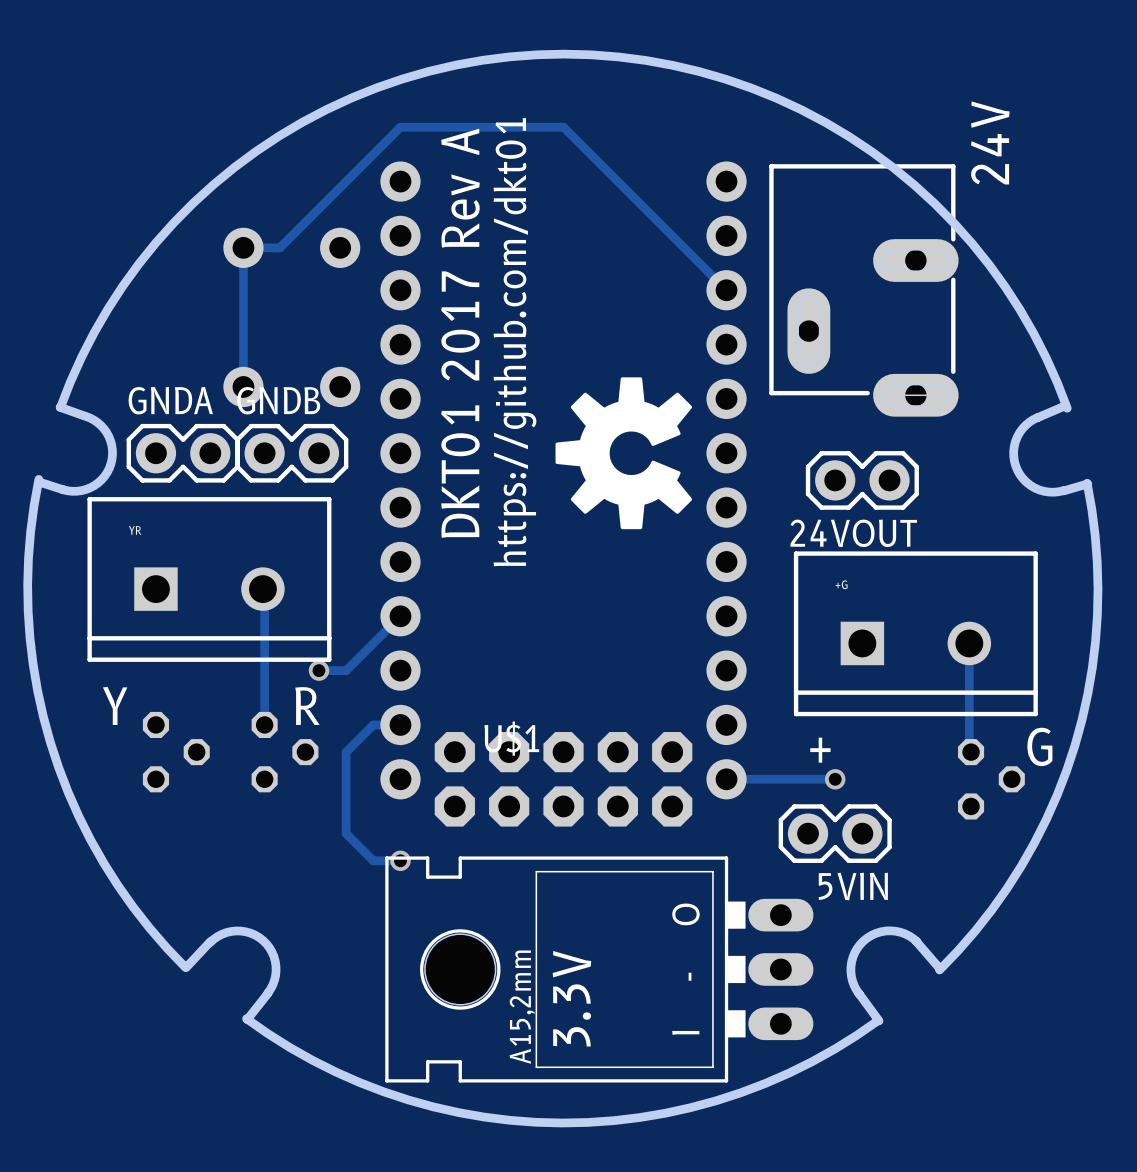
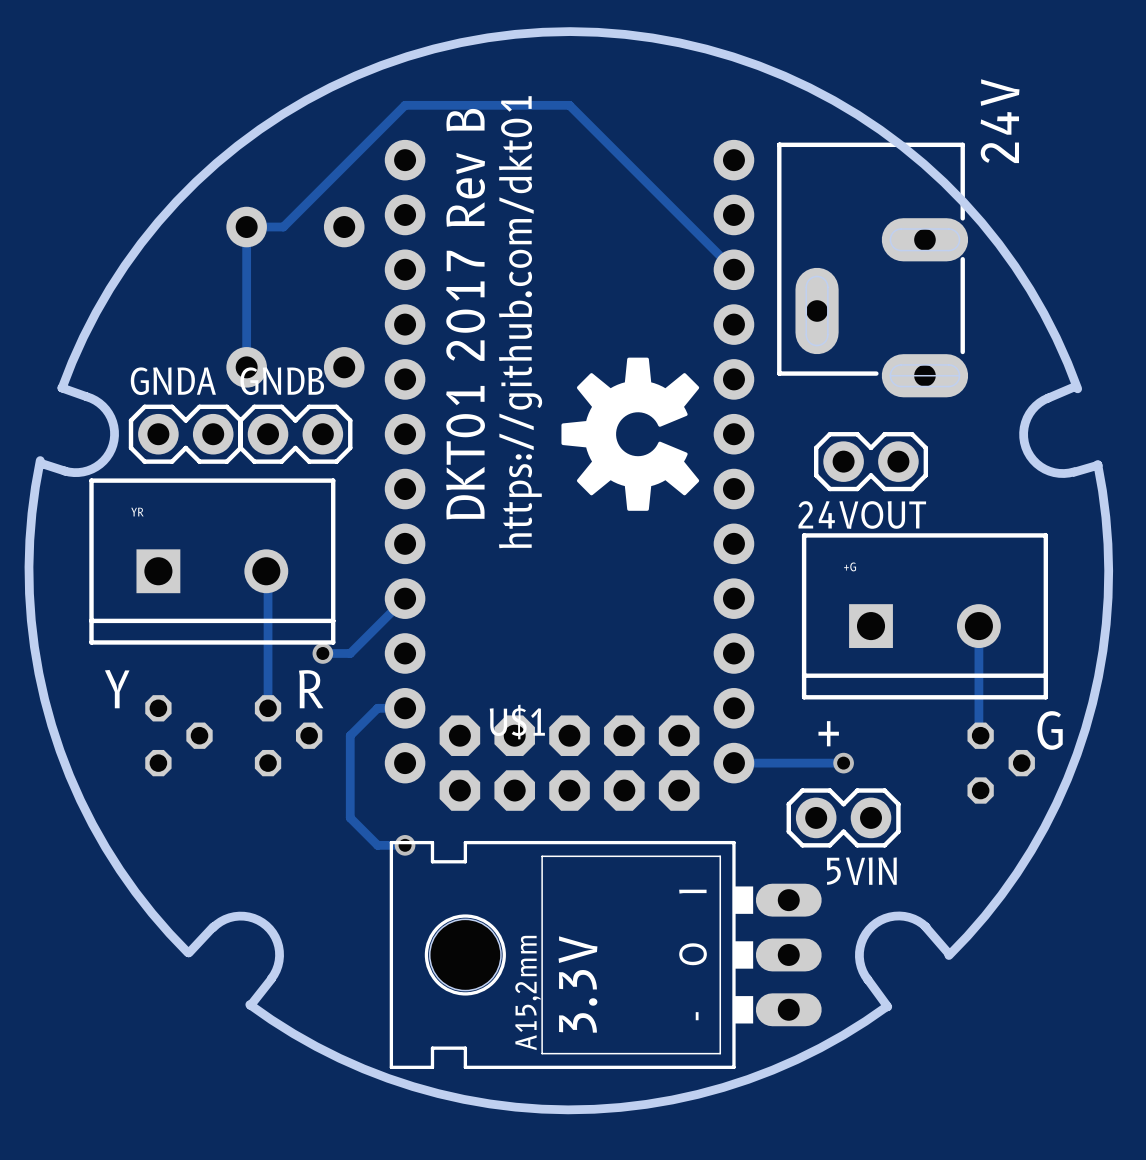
text: DKT01 2017 Rev A (460, 333) -> DKT01 2017 Rev B (465, 314)
text: O (685, 914) -> I (692, 891)
text: - (690, 976) -> O (693, 954)
text: I (685, 1032) -> - (697, 1016)

